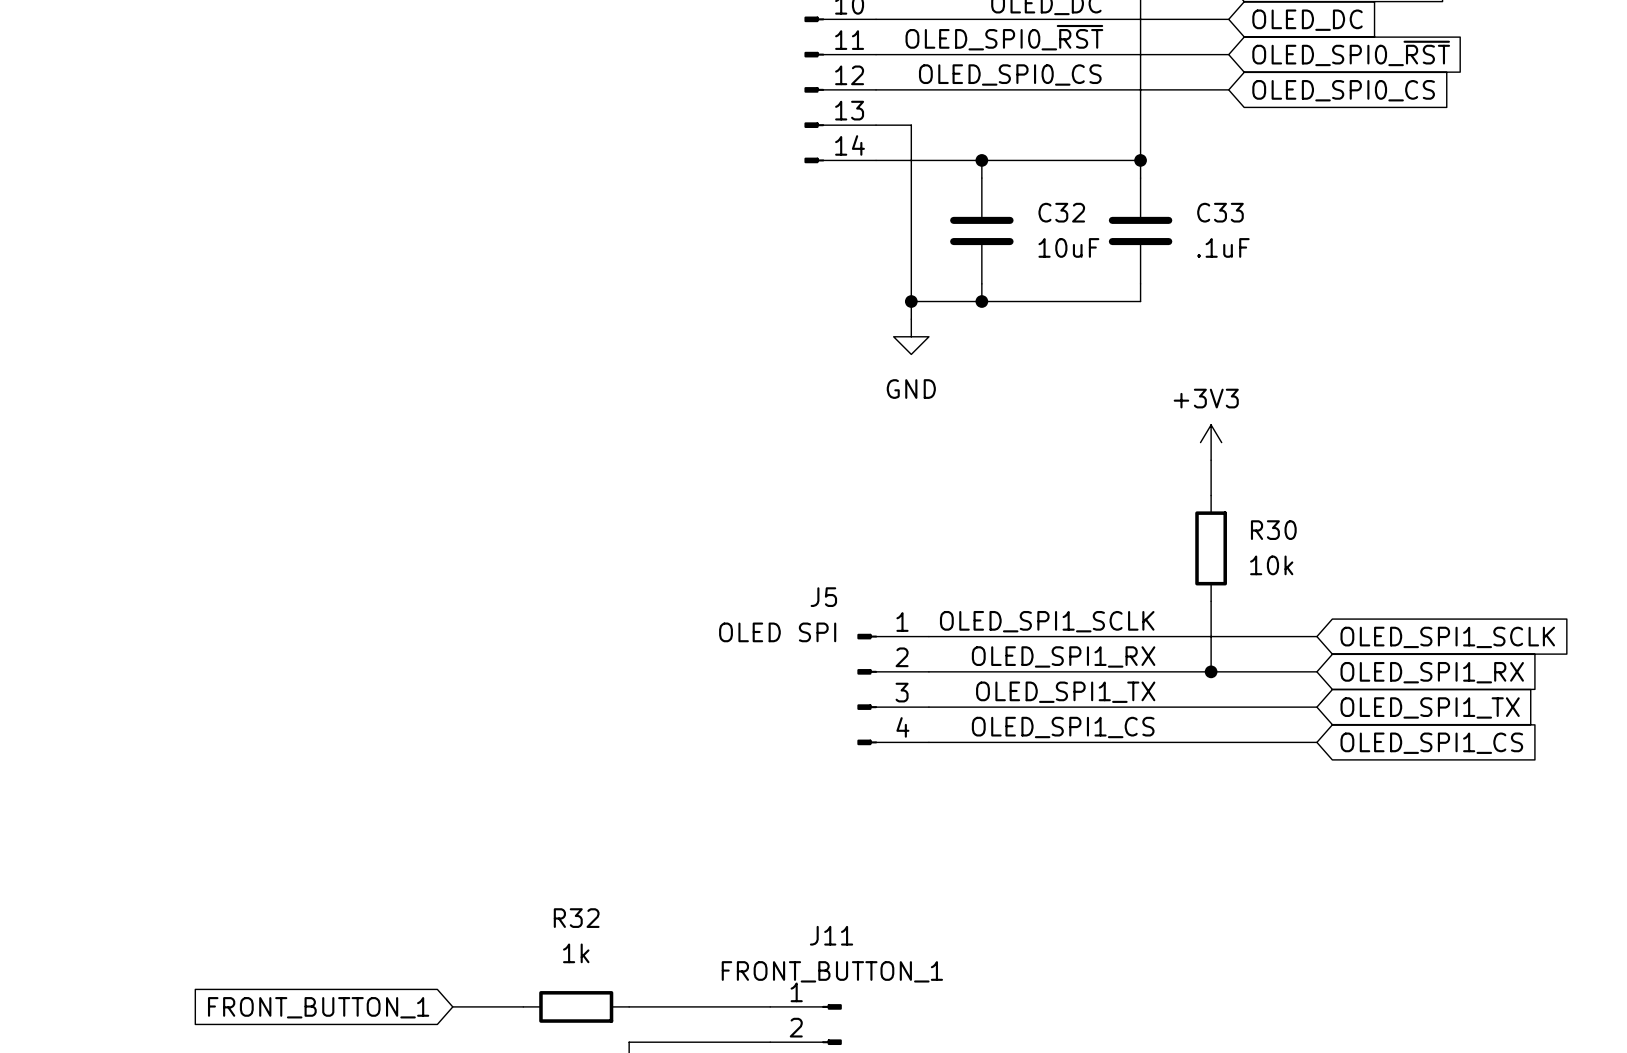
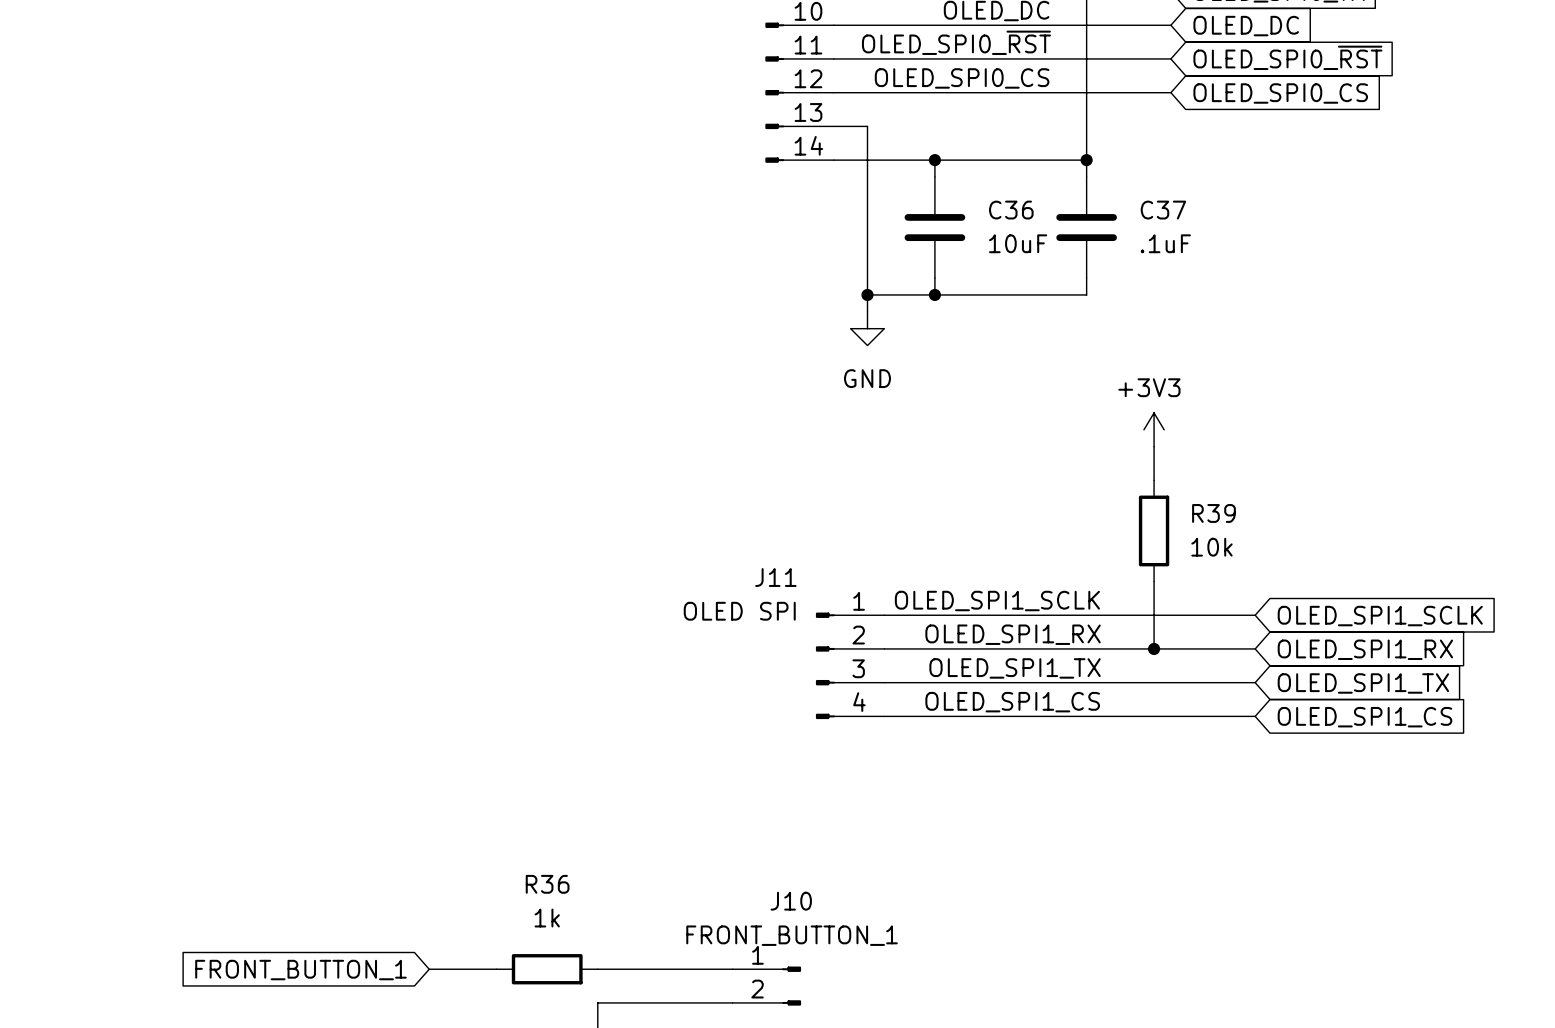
C32 name: C32 (1061, 212) -> C36 (1011, 210)
C33 name: C33 (1220, 212) -> C37 (1163, 210)
R30 name: R30 (1273, 530) -> R39 (1213, 513)
J5 name: J5 (823, 597) -> J11 (775, 577)
R32 name: R32 (576, 918) -> R36 (547, 884)
J11 name: J11 (831, 935) -> J10 (791, 901)

